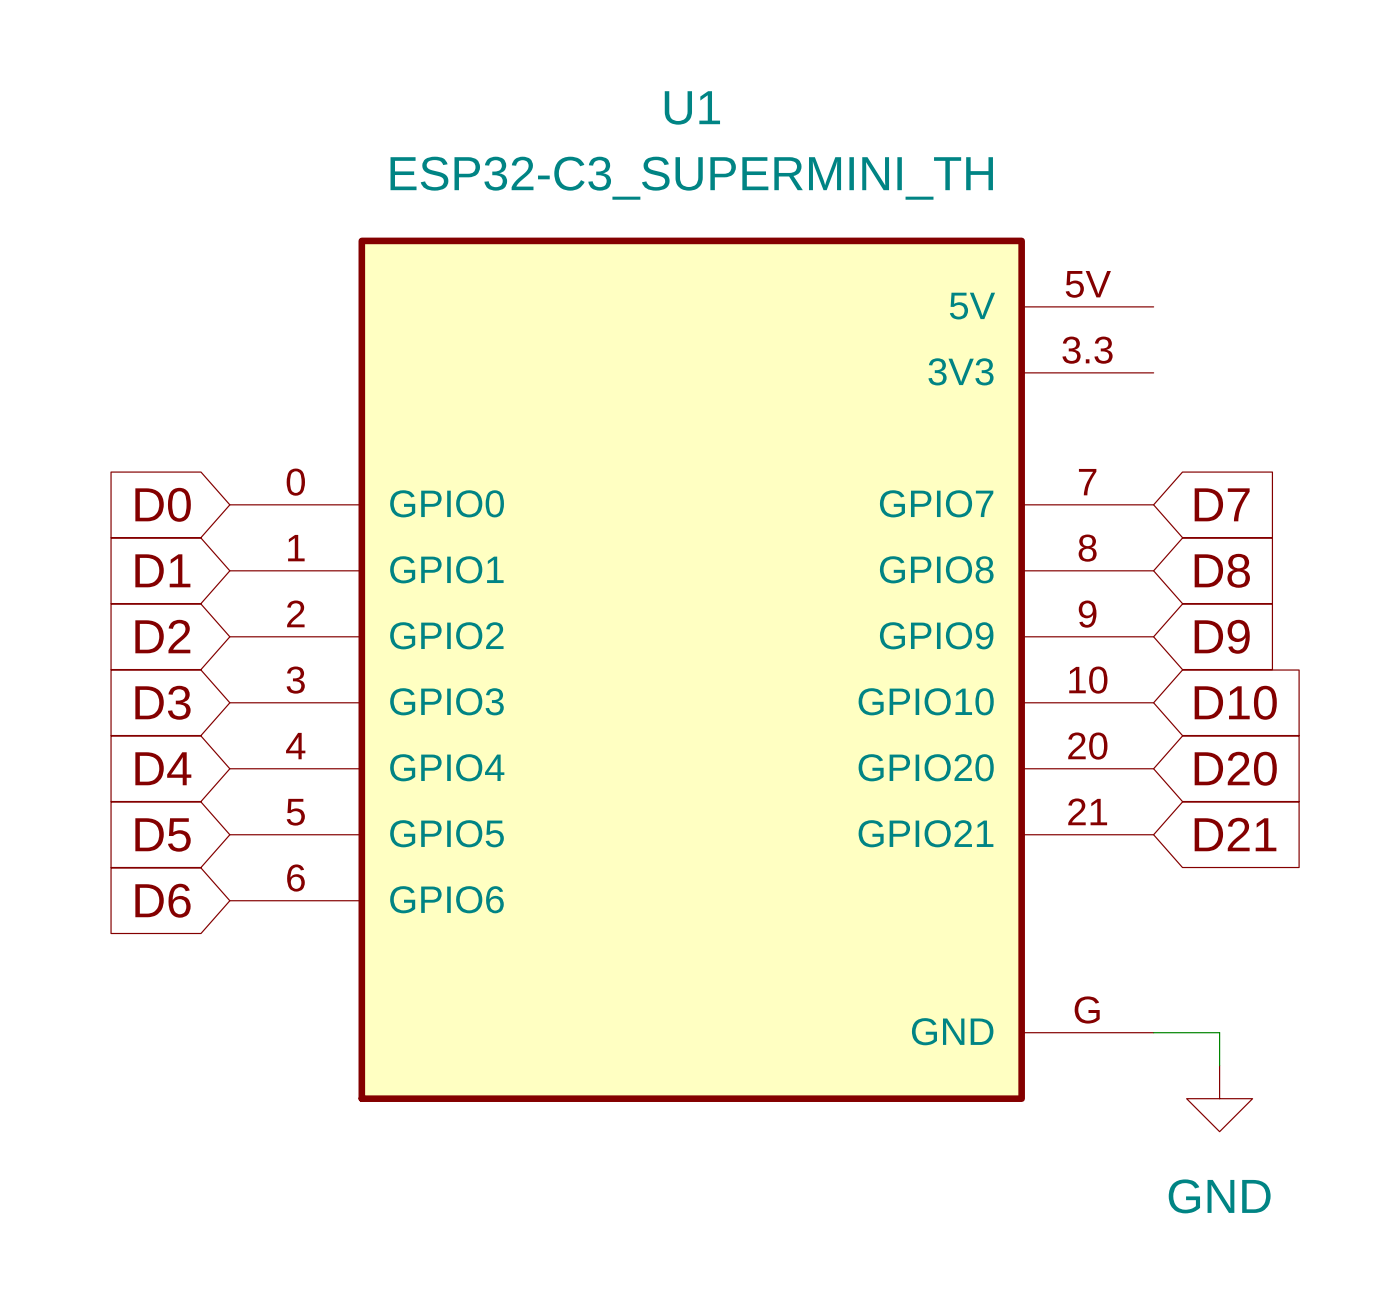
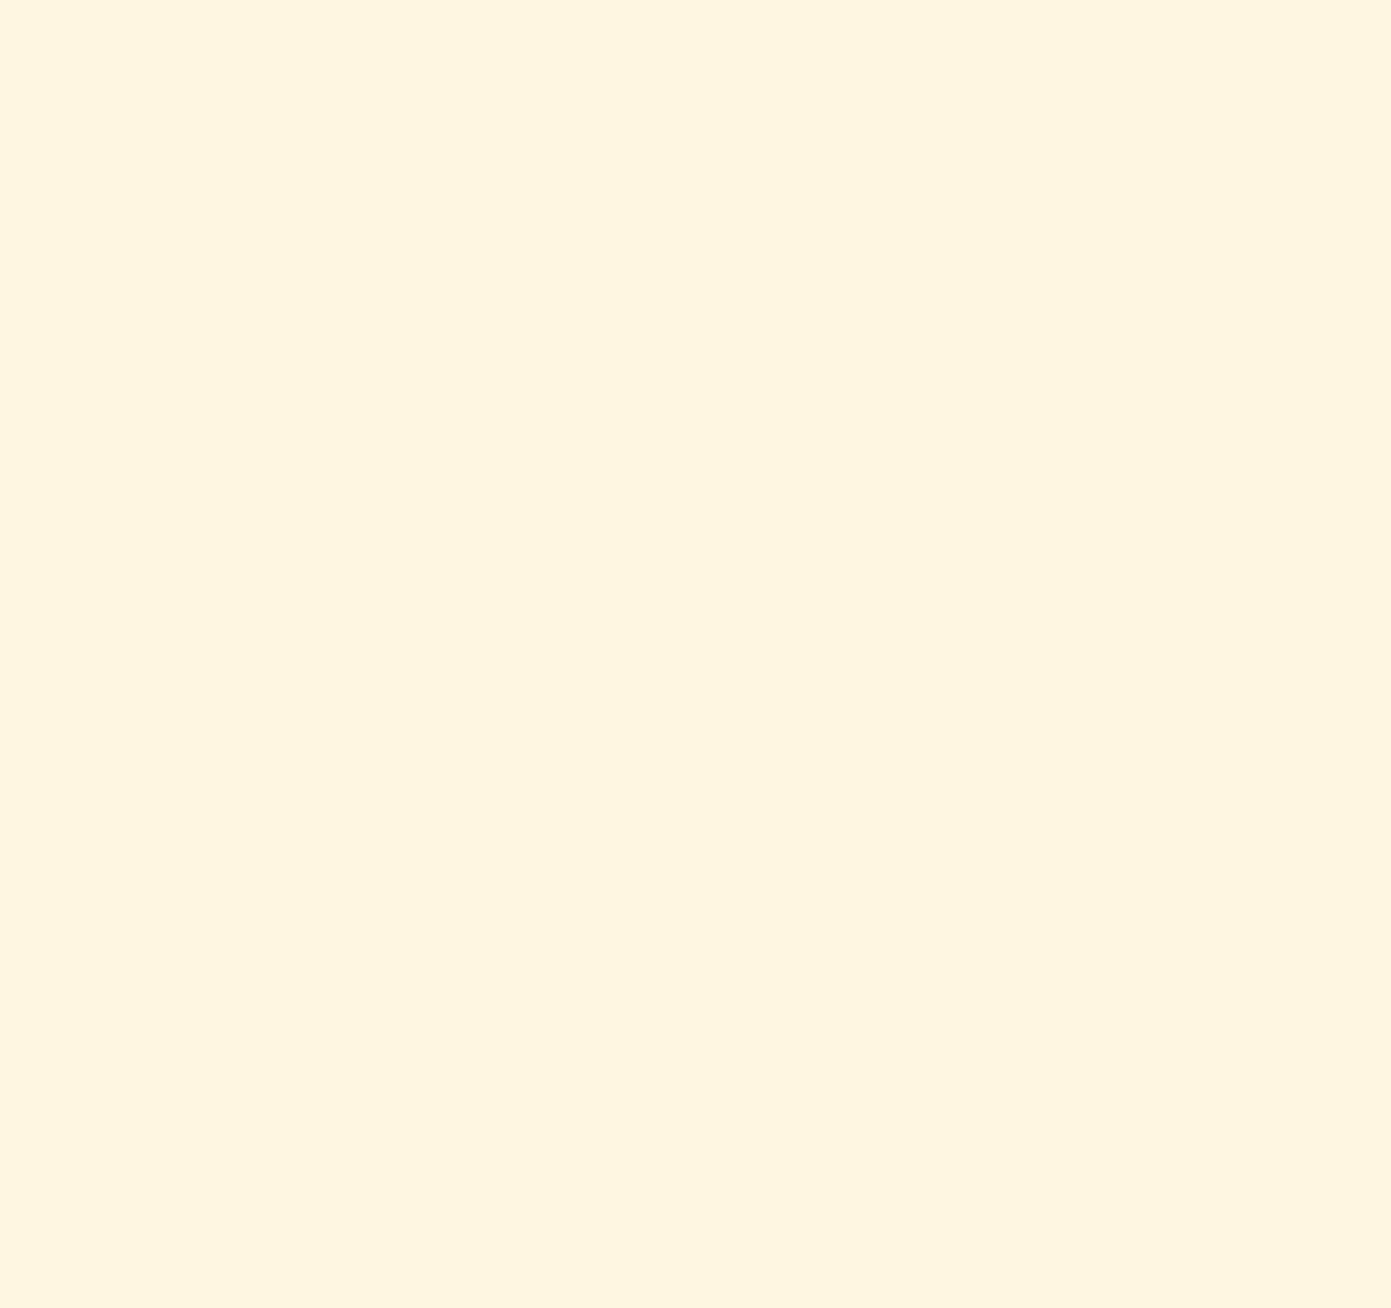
global label: D0 (163, 504) -> none
global label: D7 (1222, 504) -> none
global label: D1 (162, 570) -> none
global label: D8 (1222, 570) -> none
global label: D2 (162, 636) -> none
global label: D9 (1222, 636) -> none
U1: ESP32-C3_SUPERMINI_TH (691, 669) -> none
global label: D3 (162, 702) -> none
global label: D10 (1235, 702) -> none
global label: D4 (163, 768) -> none
global label: D20 (1235, 768) -> none
global label: D5 (163, 834) -> none
global label: D21 (1235, 834) -> none
global label: D6 (162, 900) -> none
wire: (1153, 1032) (1219, 1032) (1219, 1065) -> none
power symbol: GND (1219, 1098) -> none

